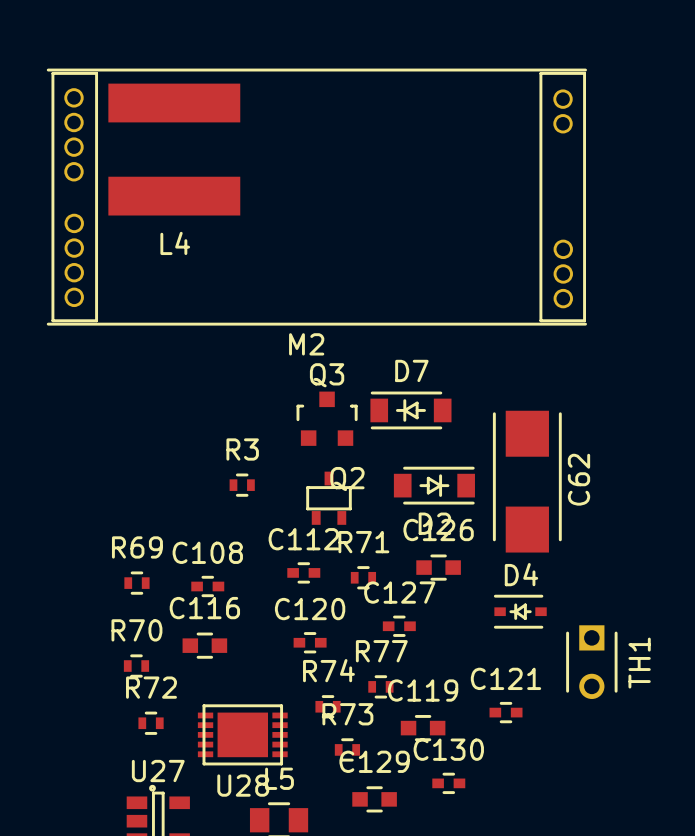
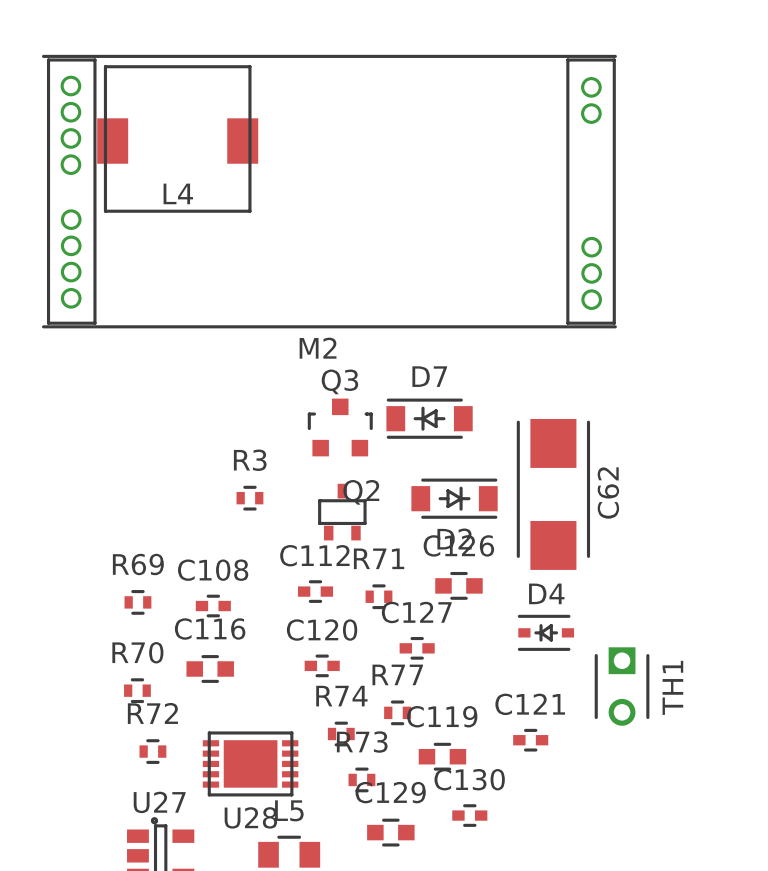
L4 footprint: [108, 83, 241, 216] -> [97, 65, 259, 213]
L4 name position: L4 (175, 243) -> L4 (178, 193)

